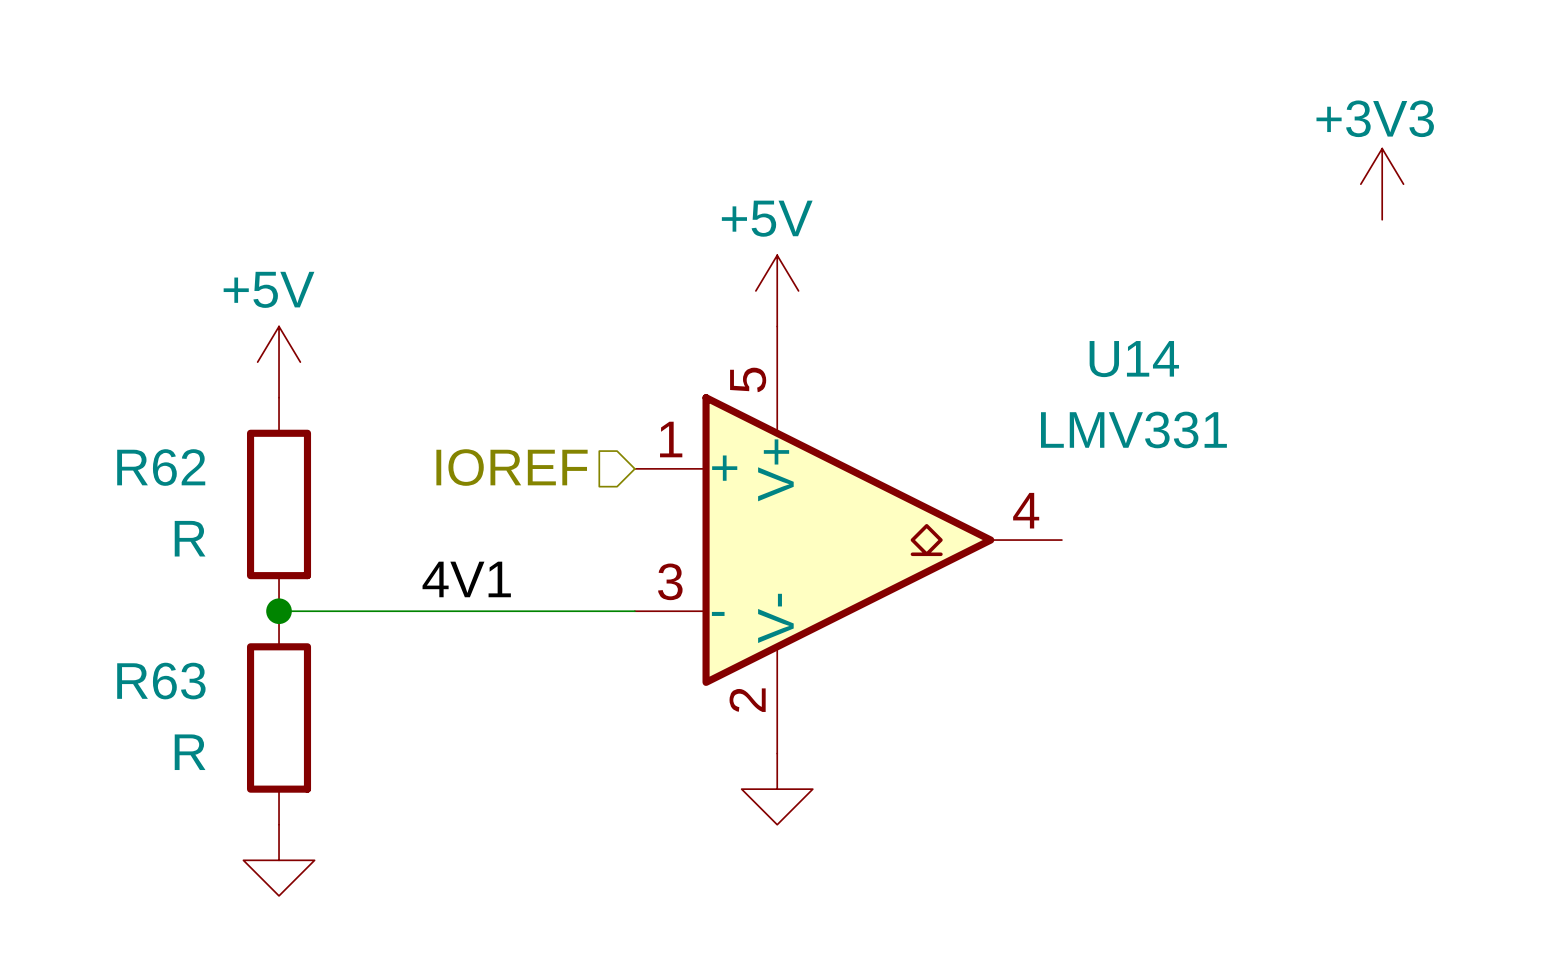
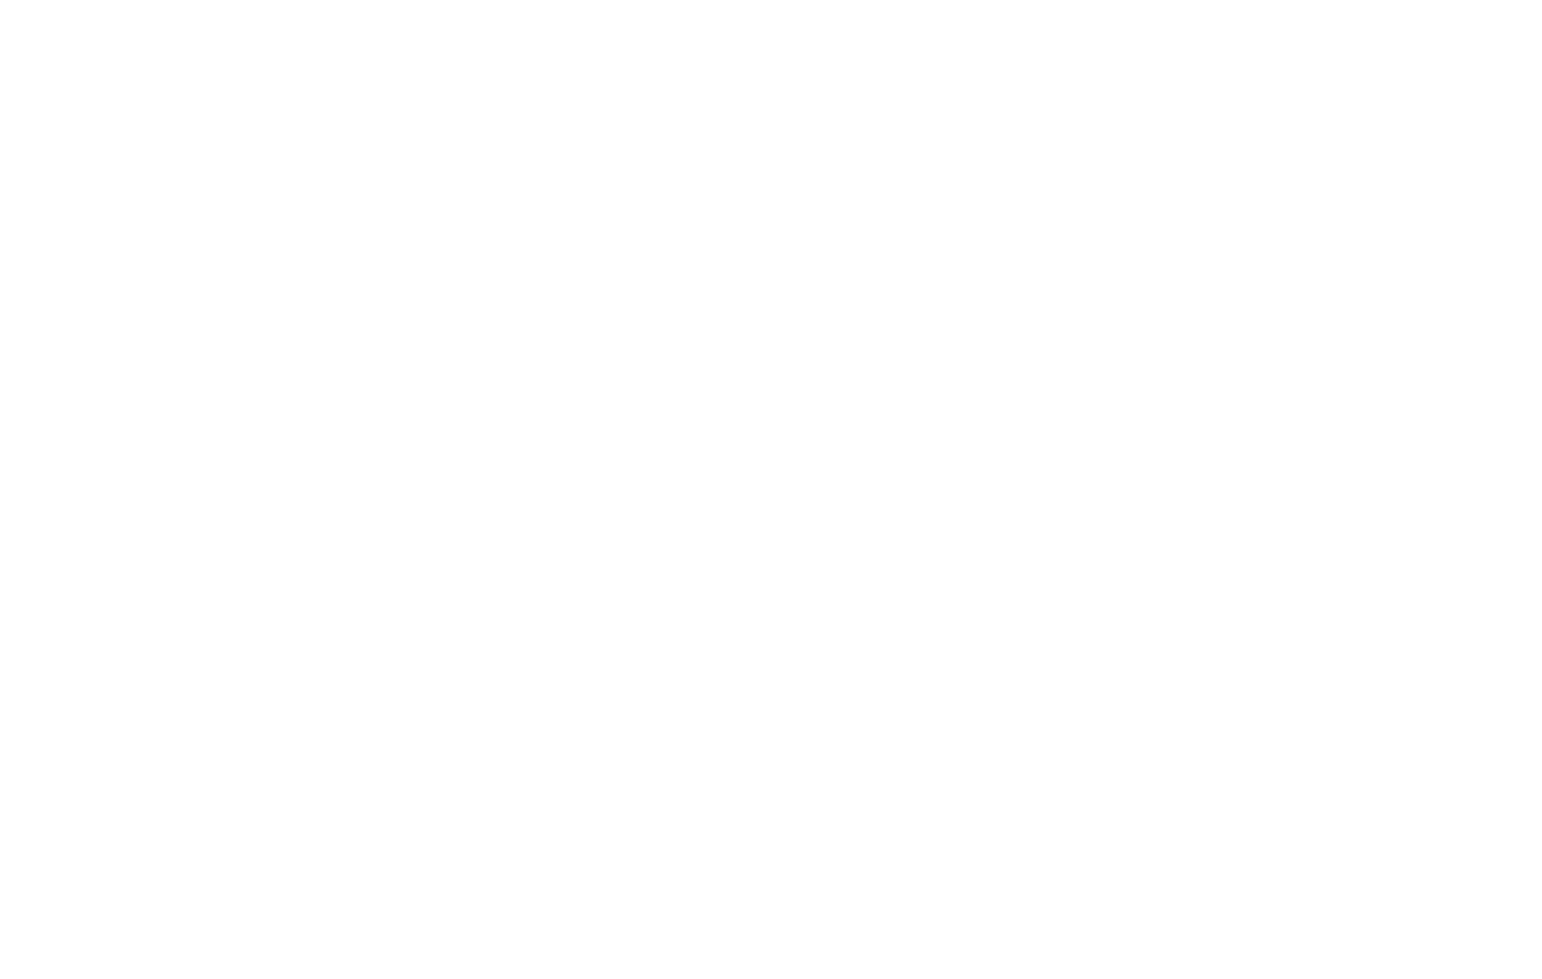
power symbol: +3V3 (1382, 184) -> none
power symbol: +5V (777, 290) -> none
power symbol: +5V (279, 362) -> none
hierarchical label: IOREF (512, 467) -> none
R62: R (279, 504) -> none
U14: LMV331 (848, 540) -> none
label: 4V1 (466, 579) -> none
wire: (279, 611) (634, 611) -> none
junction: (279, 611) -> none
R63: R (279, 717) -> none
power symbol: (777, 789) -> none
power symbol: (279, 860) -> none

